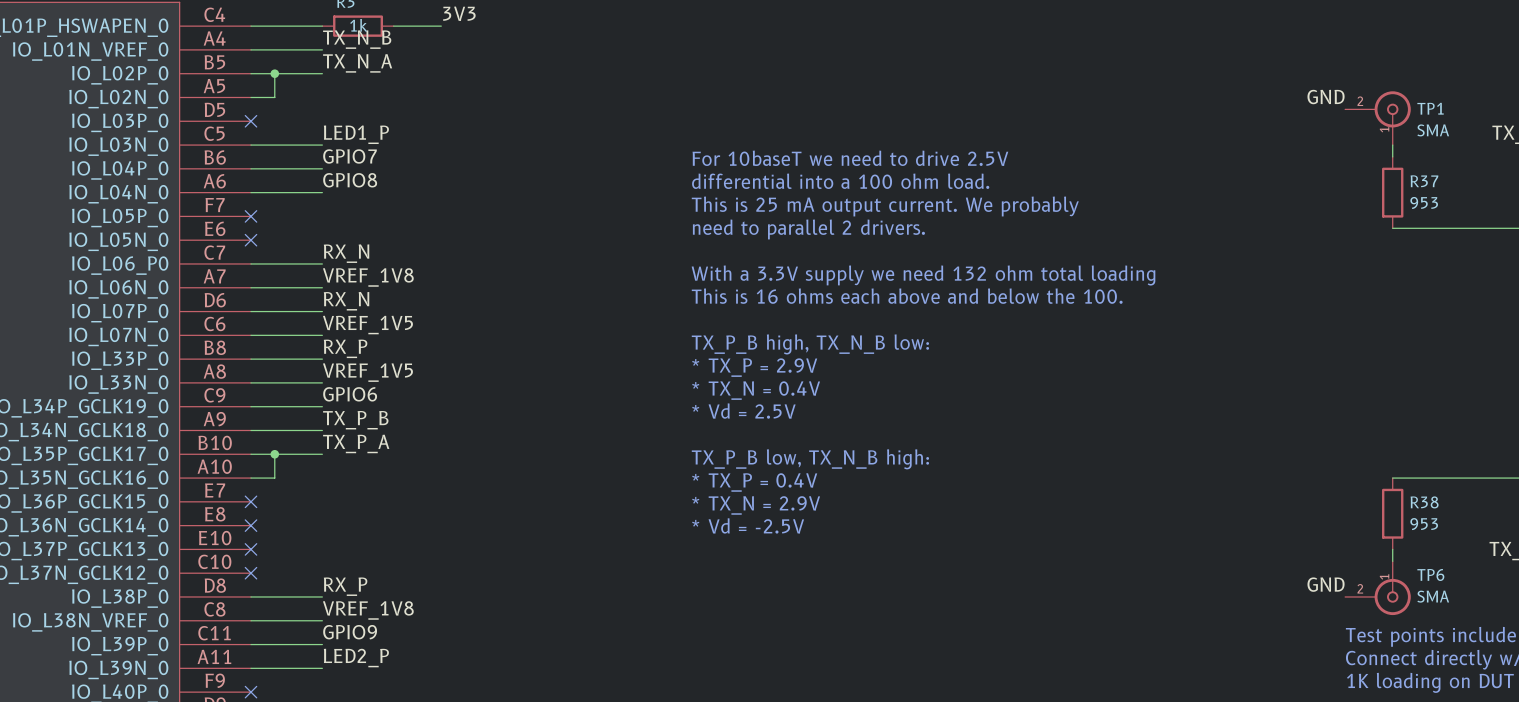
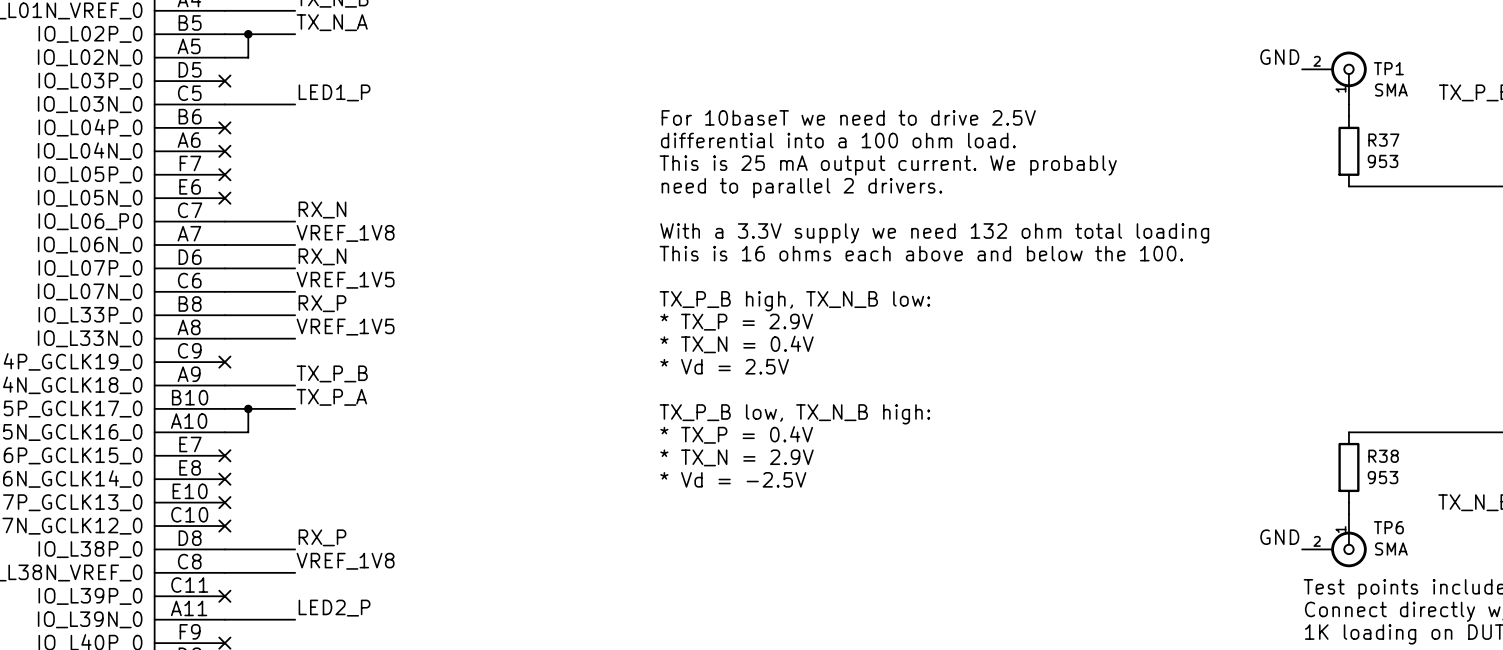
label: GPIO7 (349, 156) -> none
wire: (250, 168) (322, 168) -> none
no-connect mark: none -> (224, 127)
label: GPIO8 (350, 180) -> none
wire: (250, 192) (322, 192) -> none
no-connect mark: none -> (224, 151)
label: GPIO6 (350, 394) -> none
wire: (250, 406) (322, 406) -> none
no-connect mark: none -> (224, 362)
label: GPIO9 (350, 632) -> none
wire: (250, 644) (322, 644) -> none
no-connect mark: none -> (224, 596)

